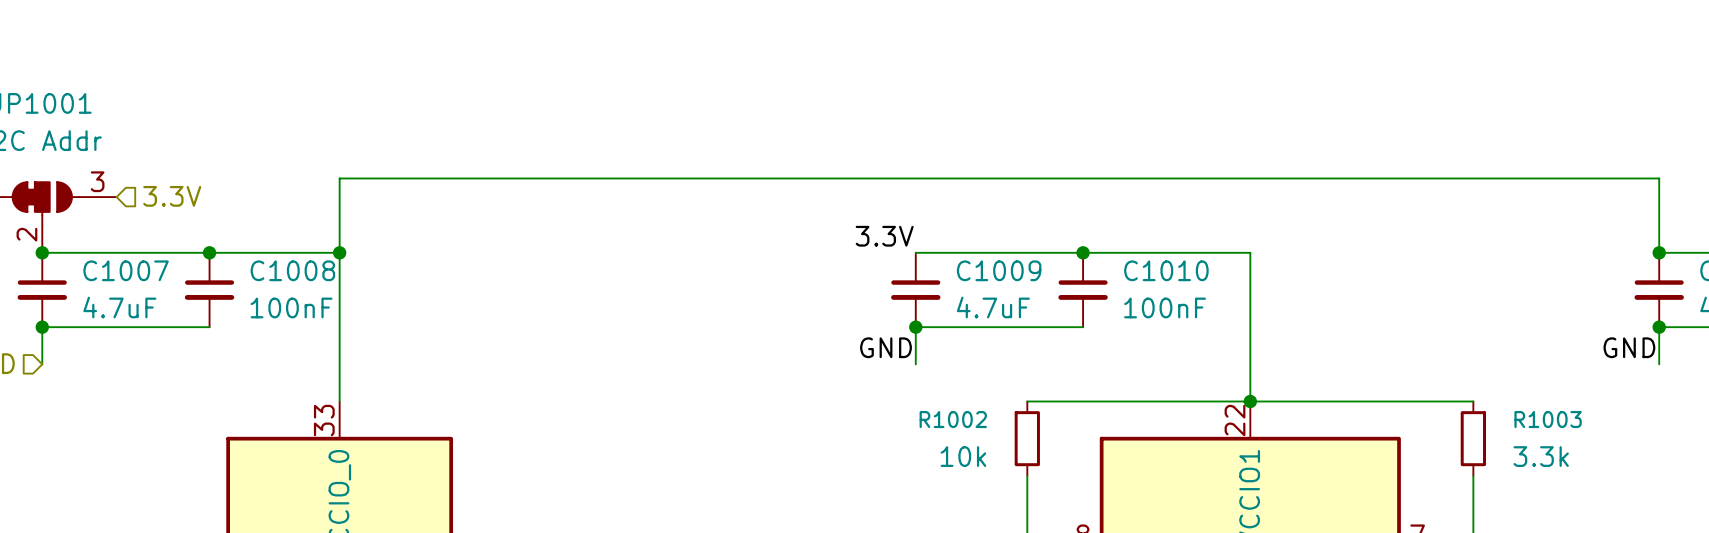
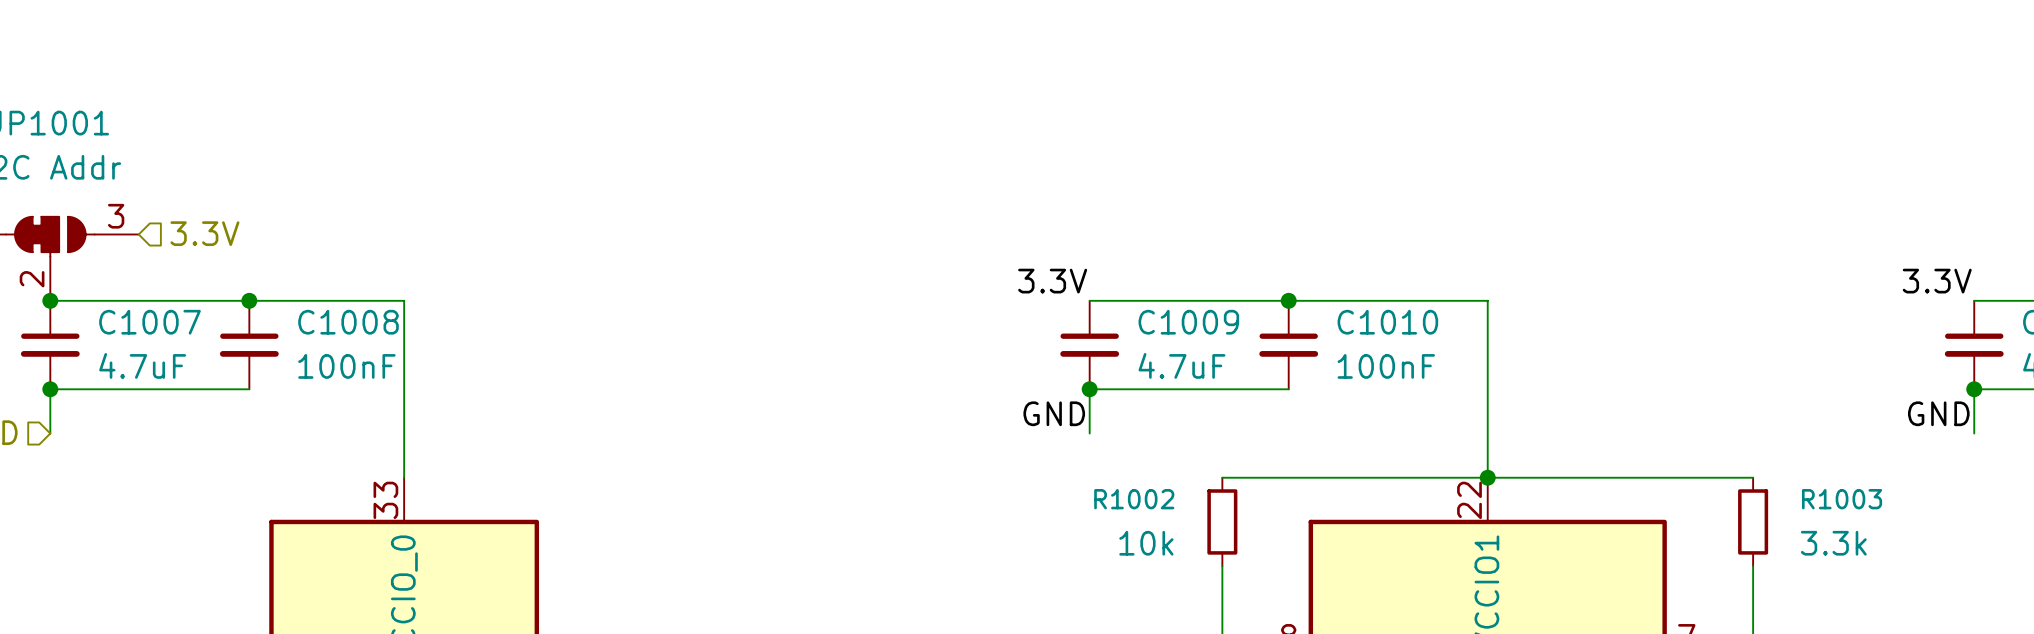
label: none -> 3.3V (1937, 281)
wire: (339, 252) (339, 178) (1659, 178) (1659, 252) -> none
junction: (339, 252) -> none
junction: (1659, 252) -> none

